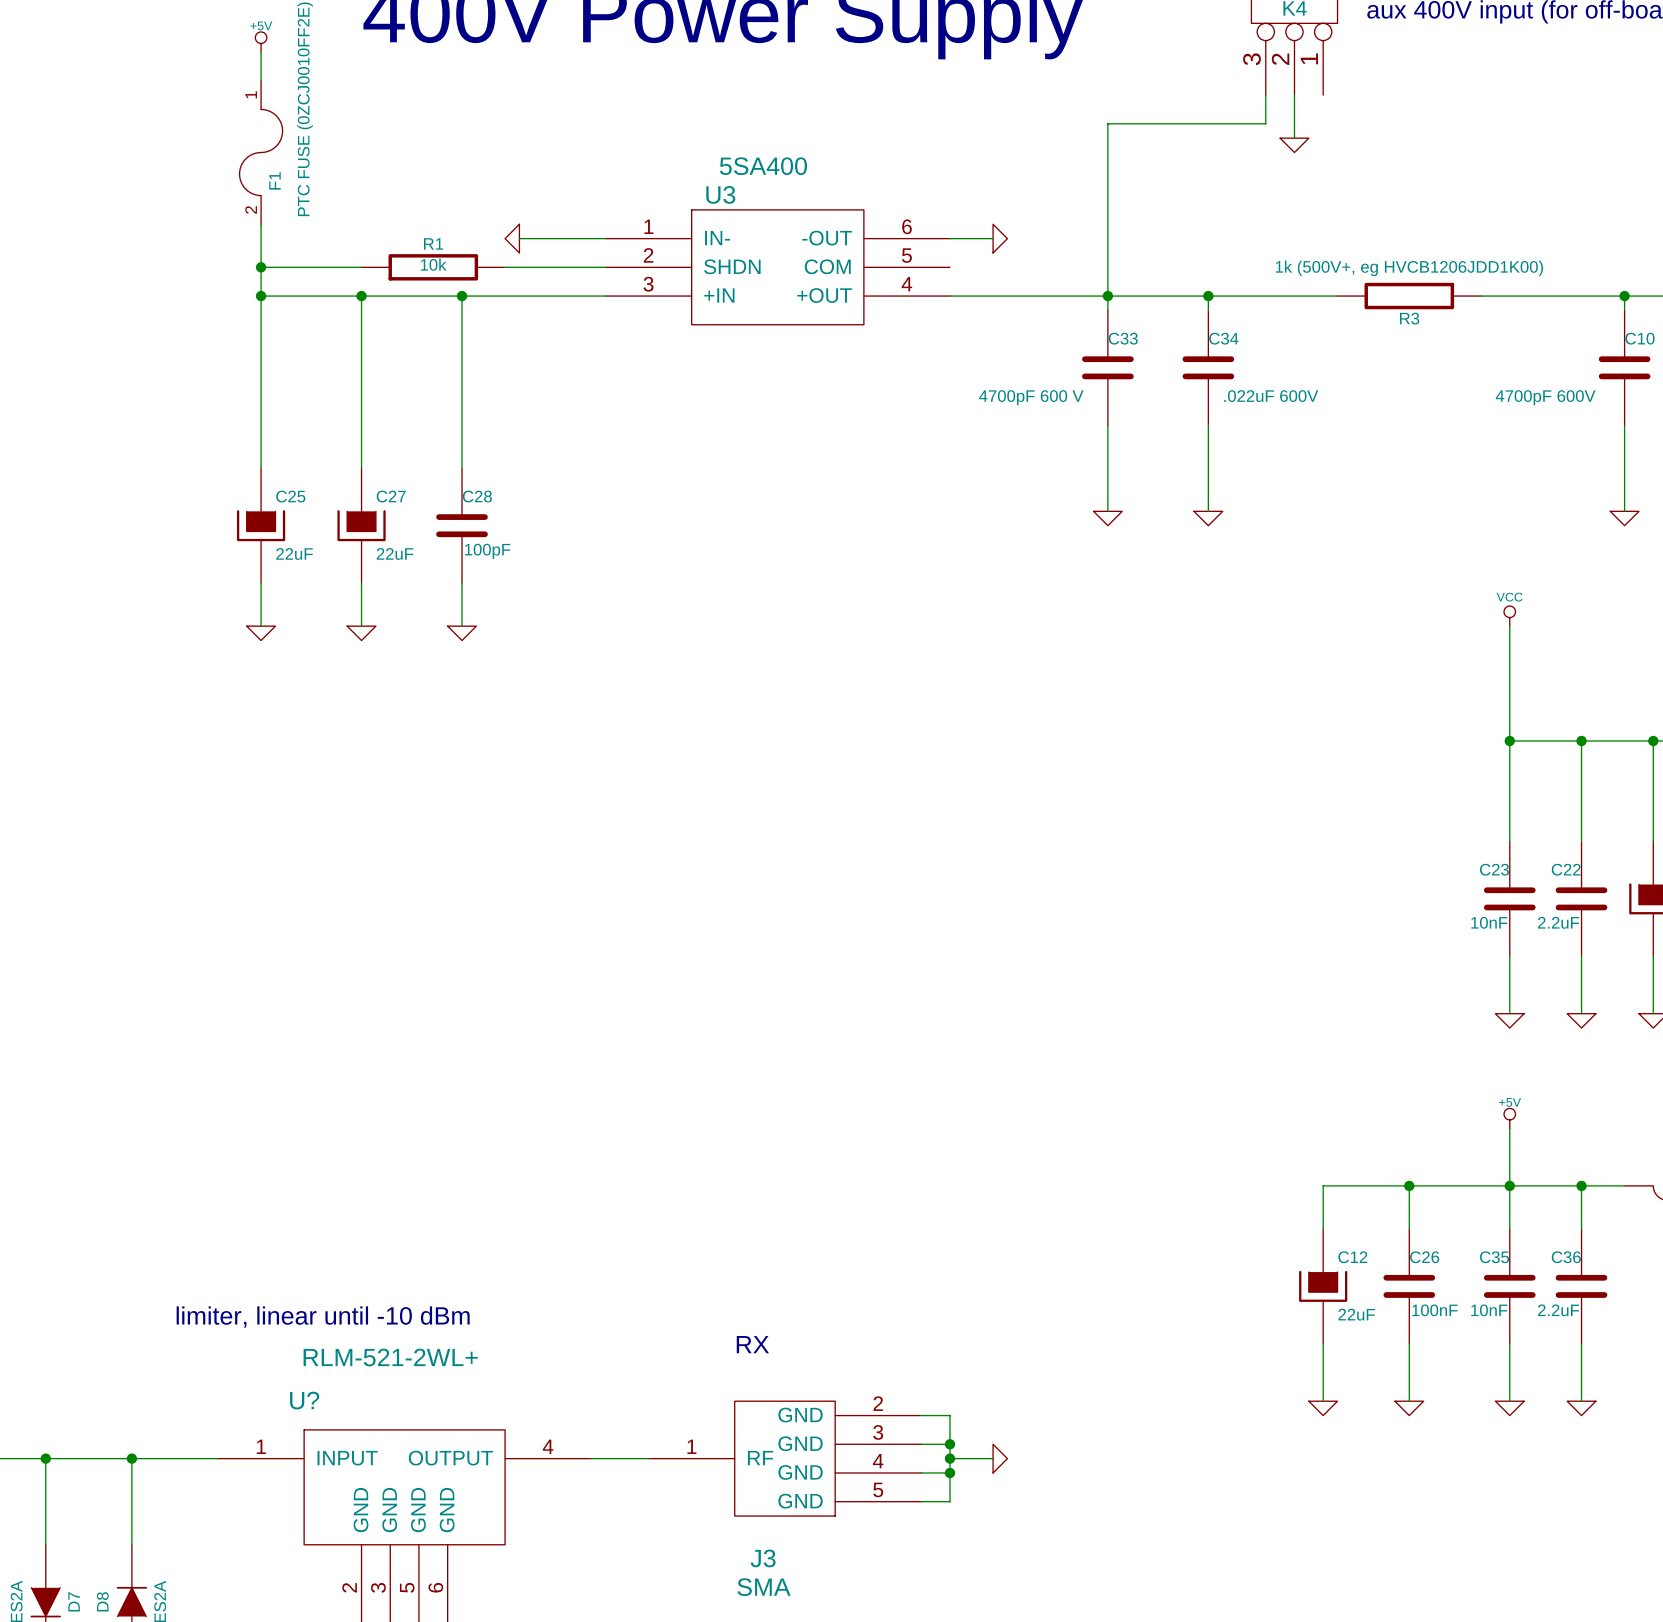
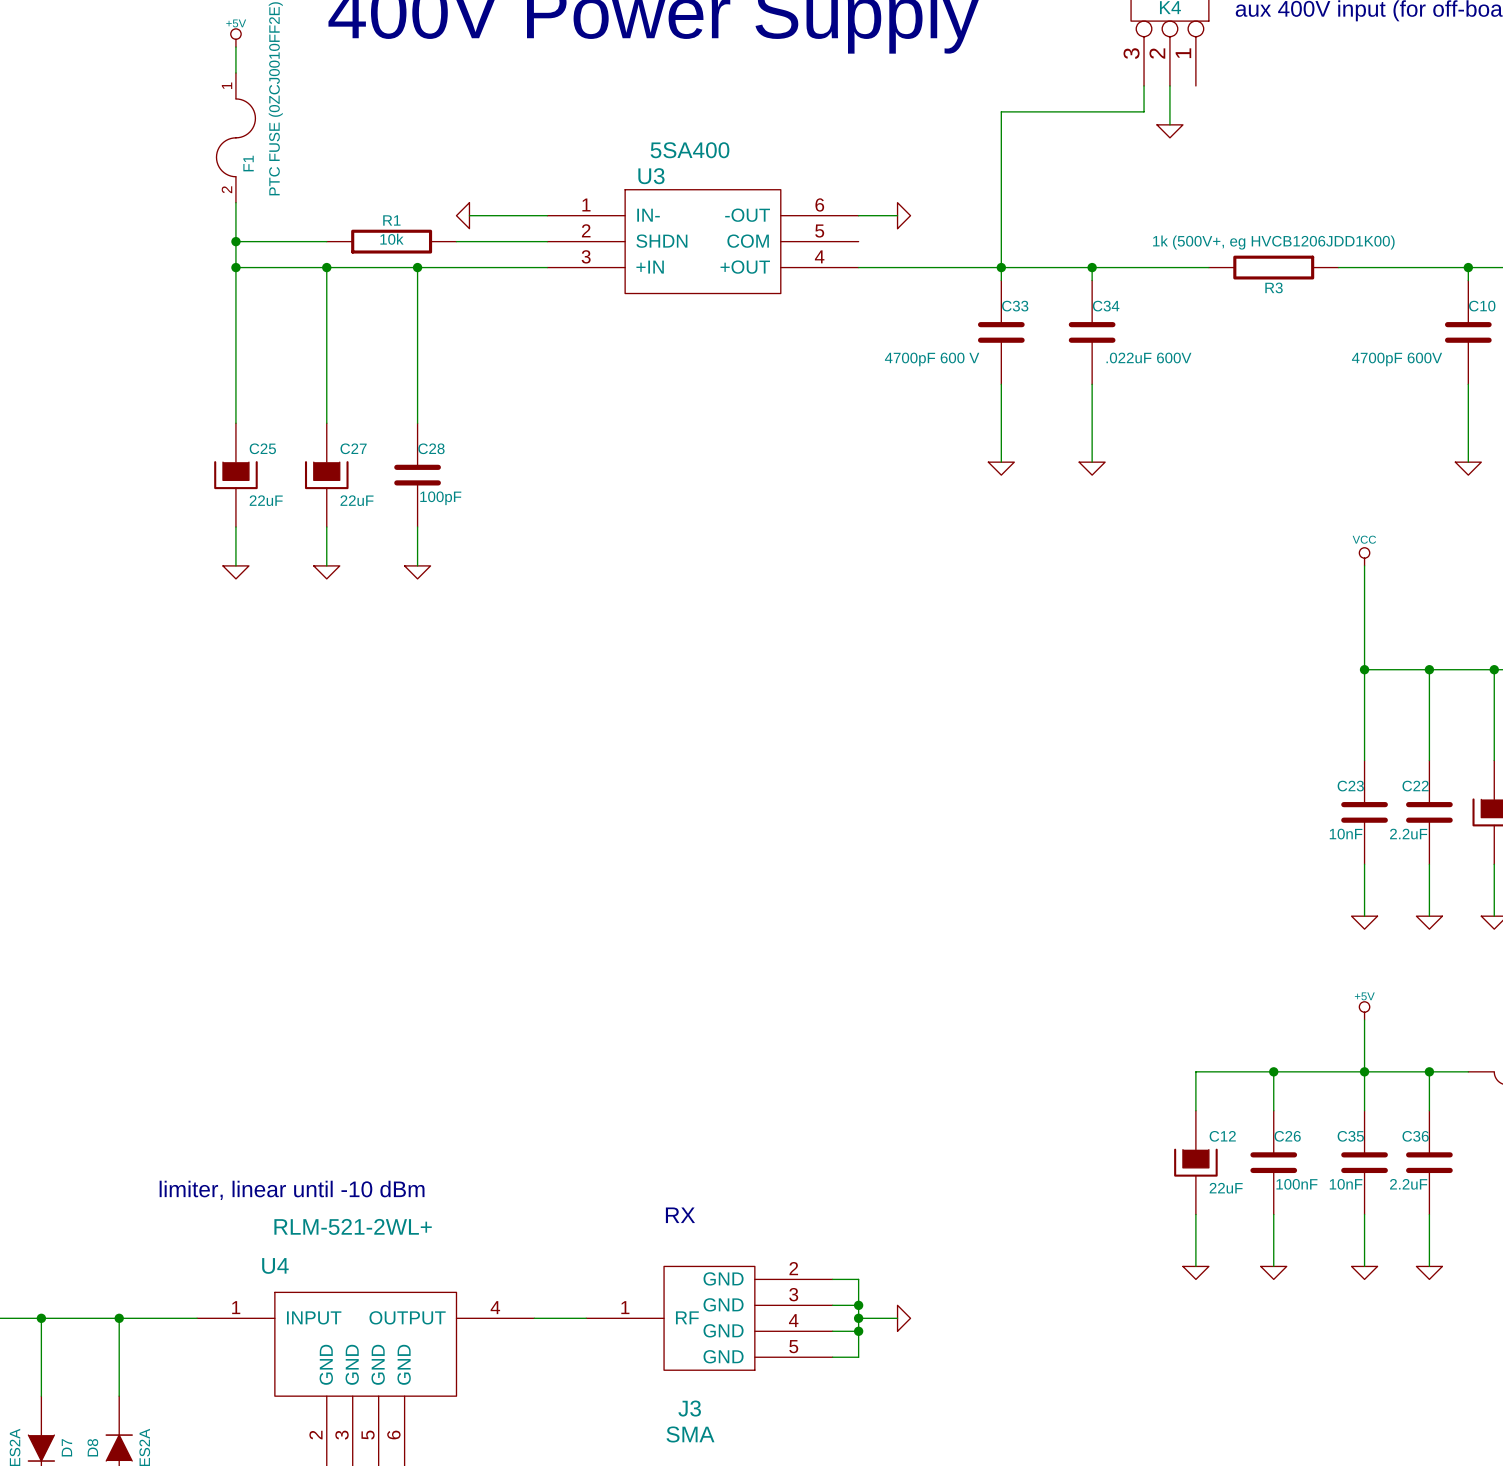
U? name: U? (304, 1400) -> U4 (275, 1265)

